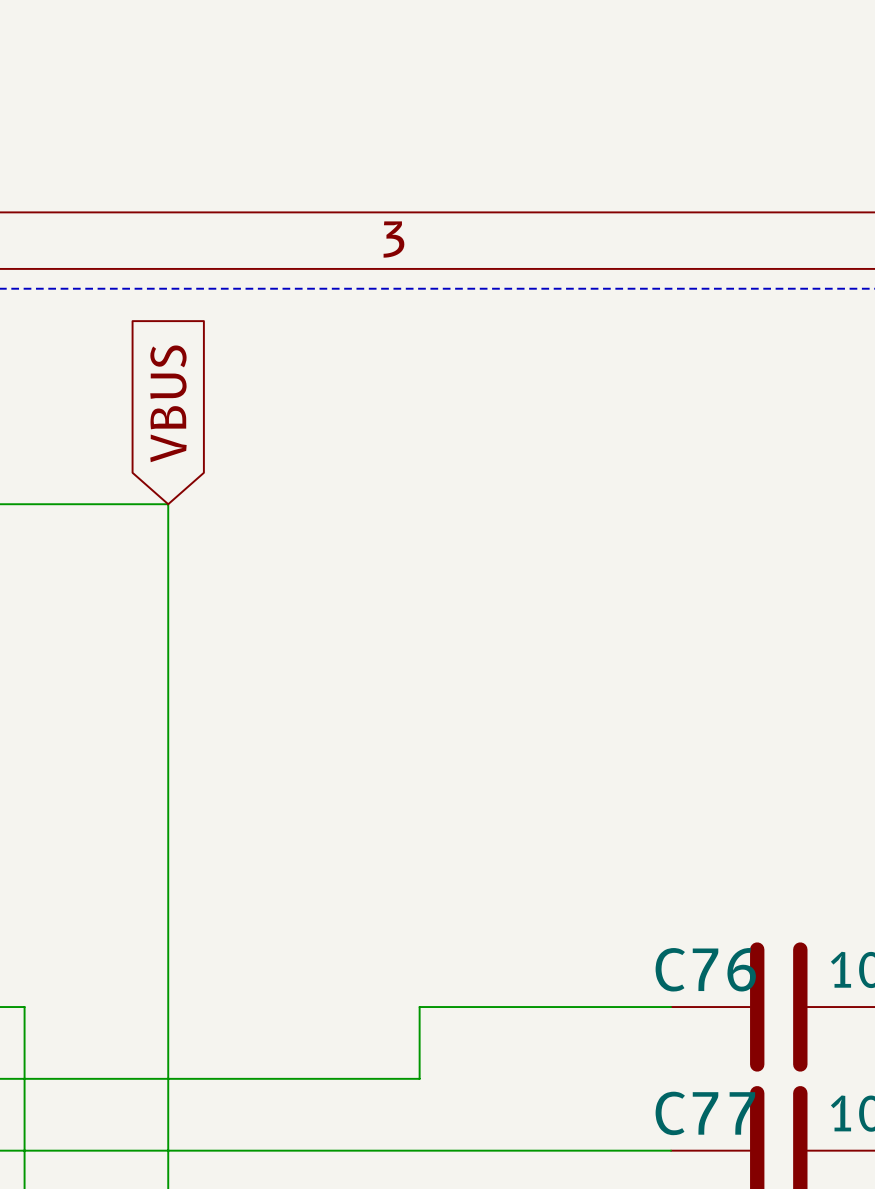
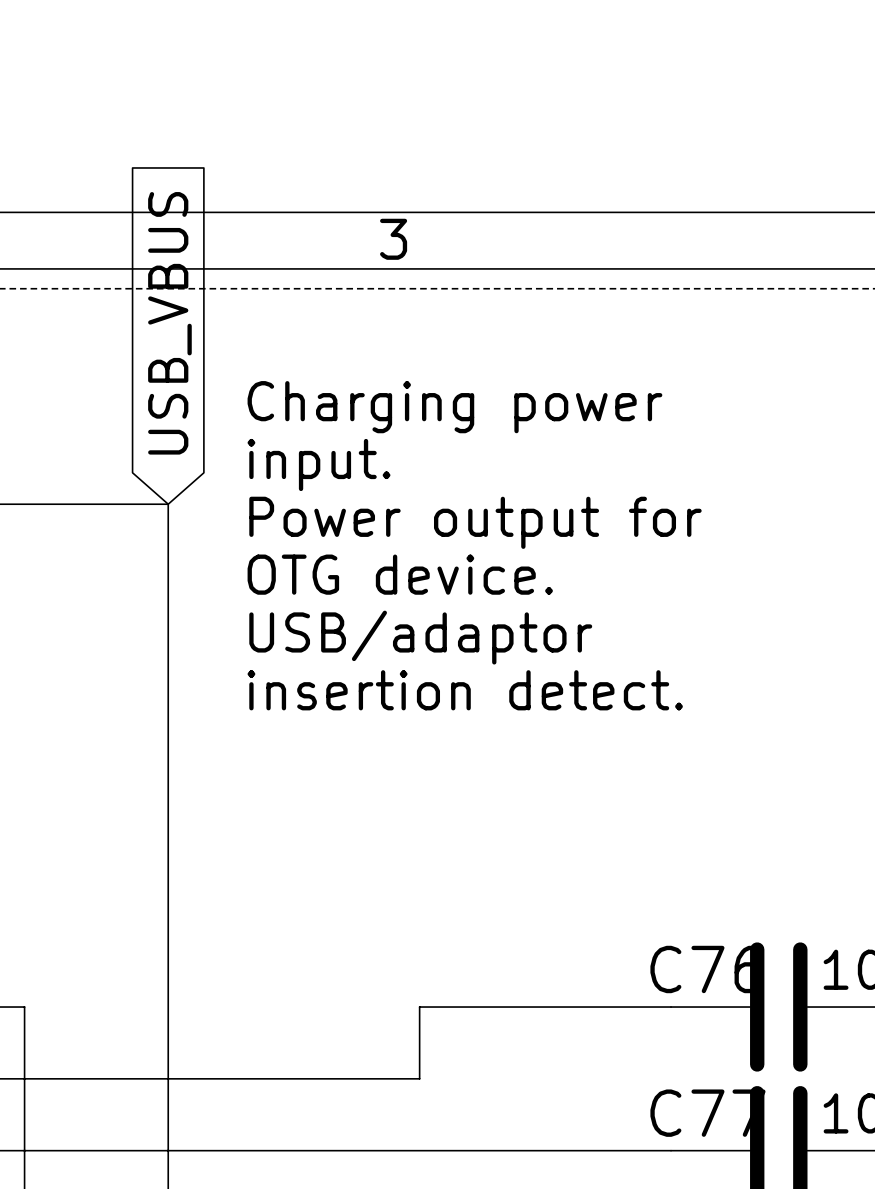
global label: VBUS (168, 403) -> USB_VBUS (169, 323)
text: none -> Charging power (454, 407)
text: none -> input. (319, 464)
text: none -> Power output for (475, 522)
text: none -> OTG device. (400, 574)
text: none -> USB/adaptor (420, 637)
text: none -> insertion detect. (465, 690)

